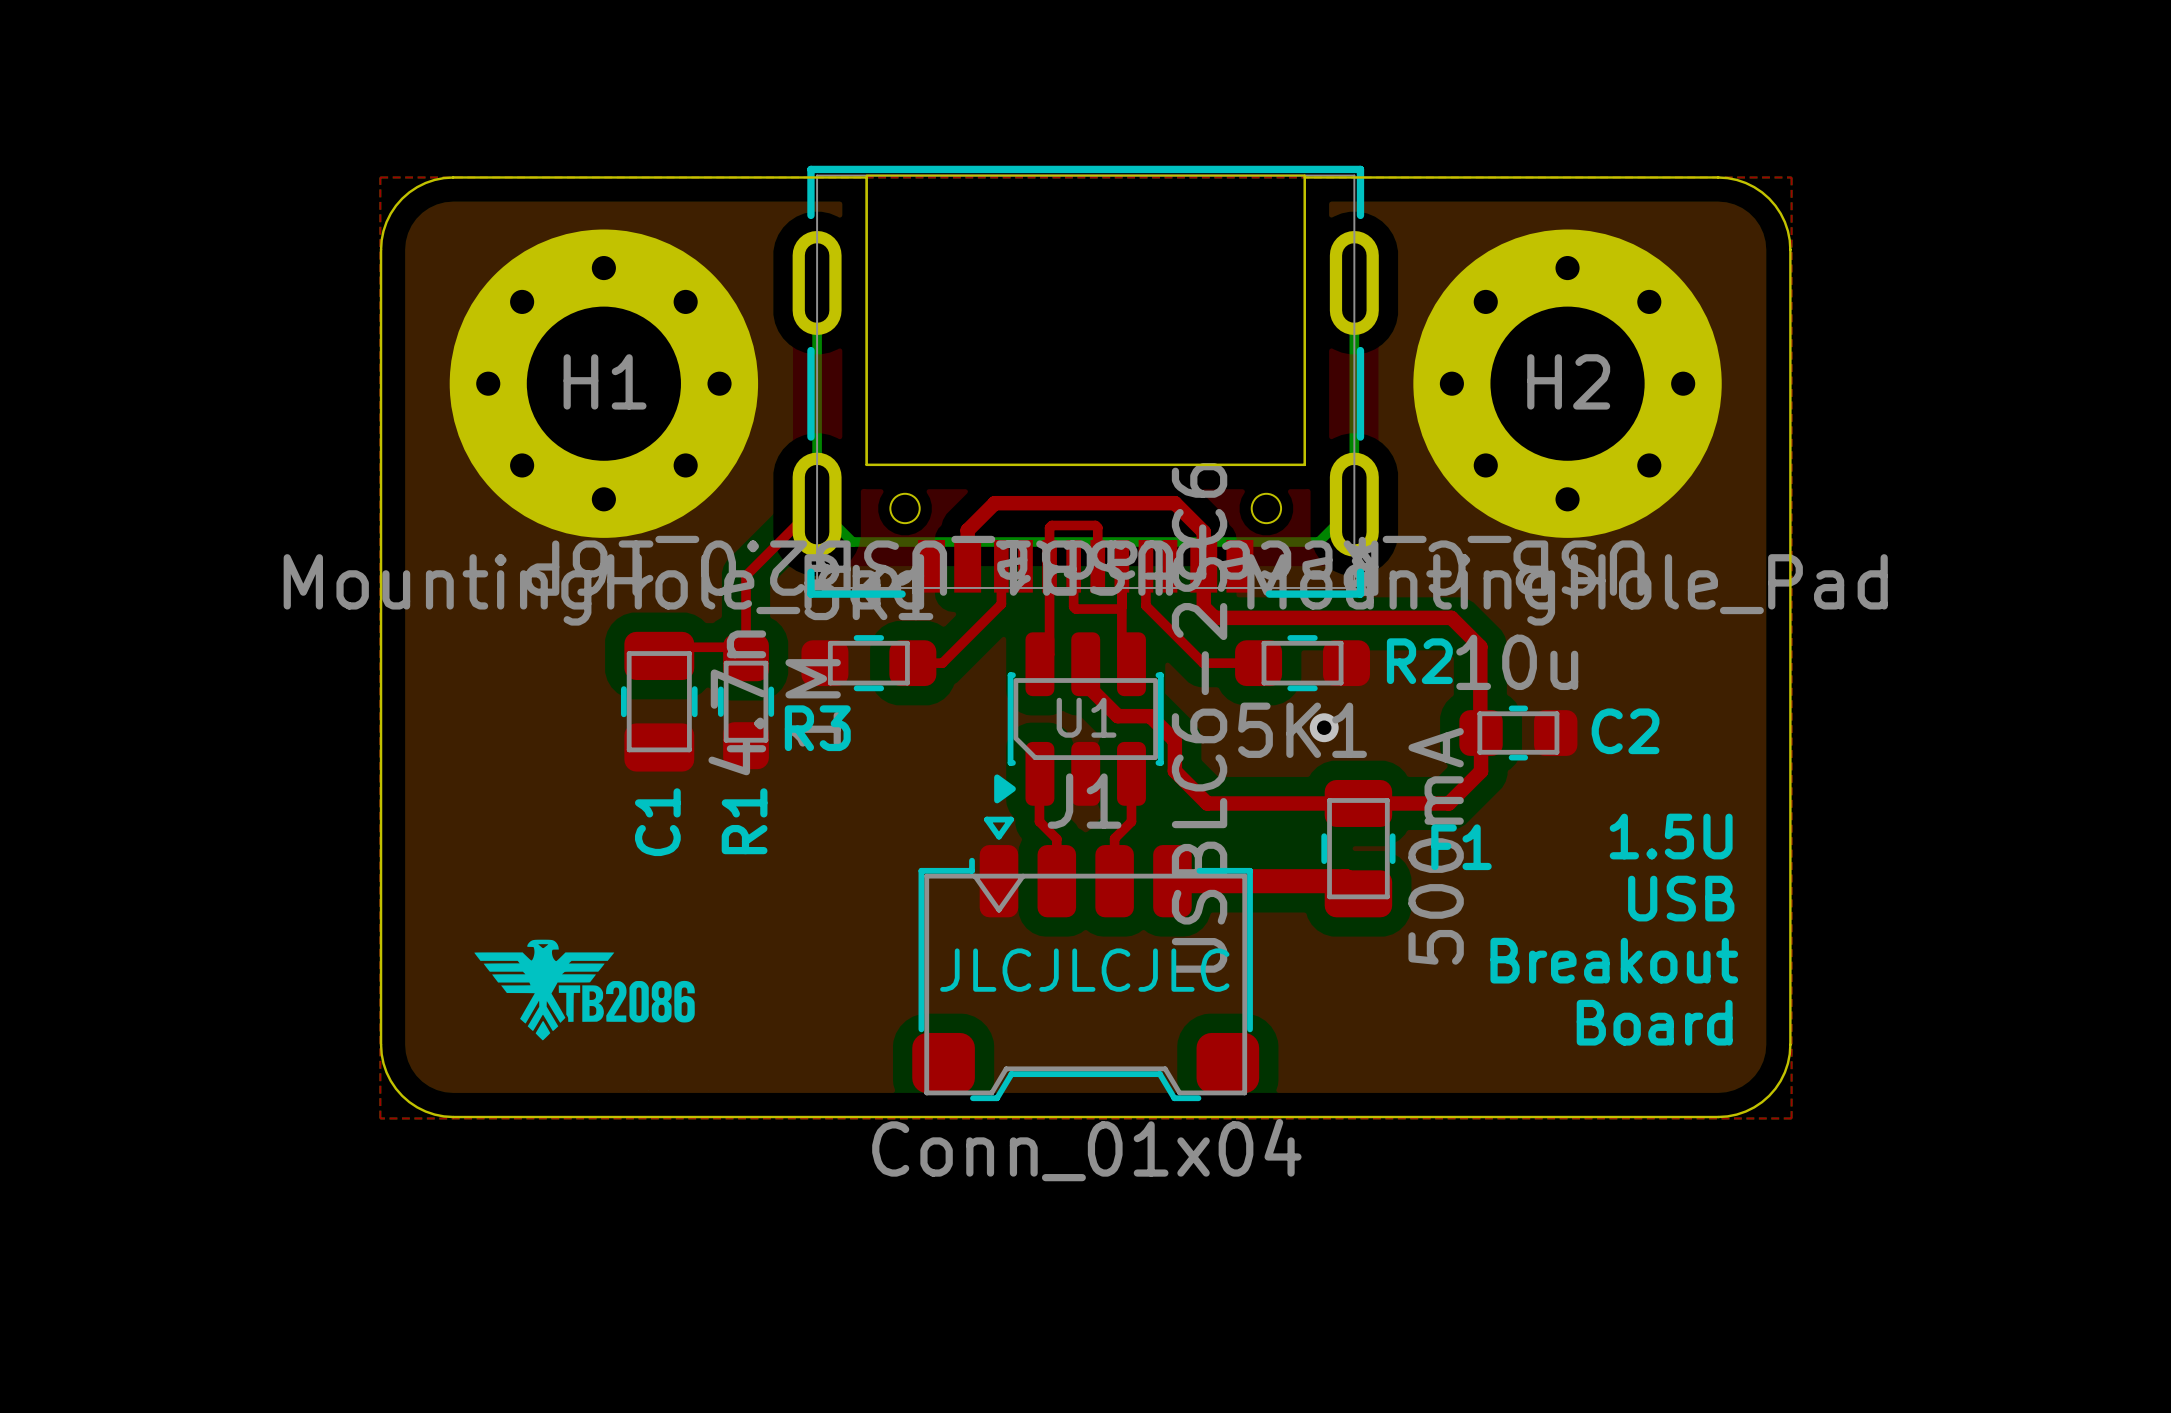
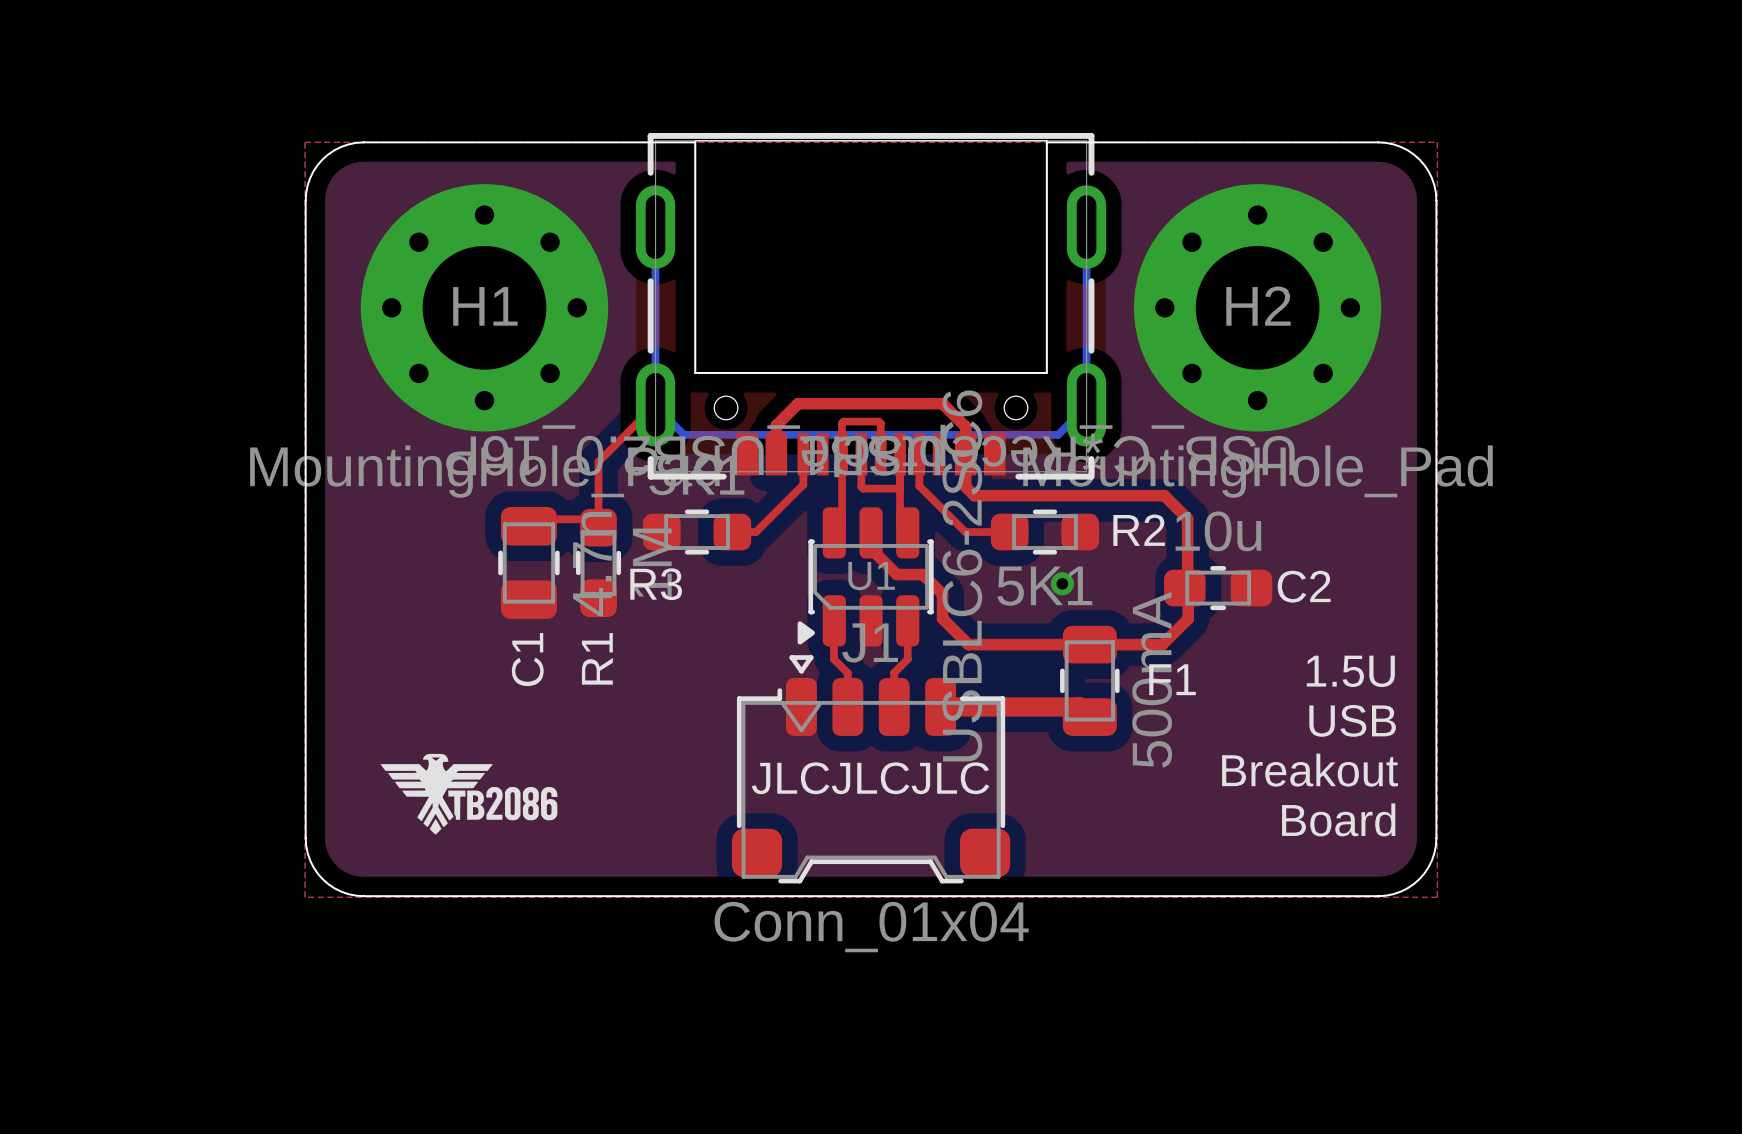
C2 footprint: [1459, 705, 1578, 761] -> [1164, 566, 1273, 611]

